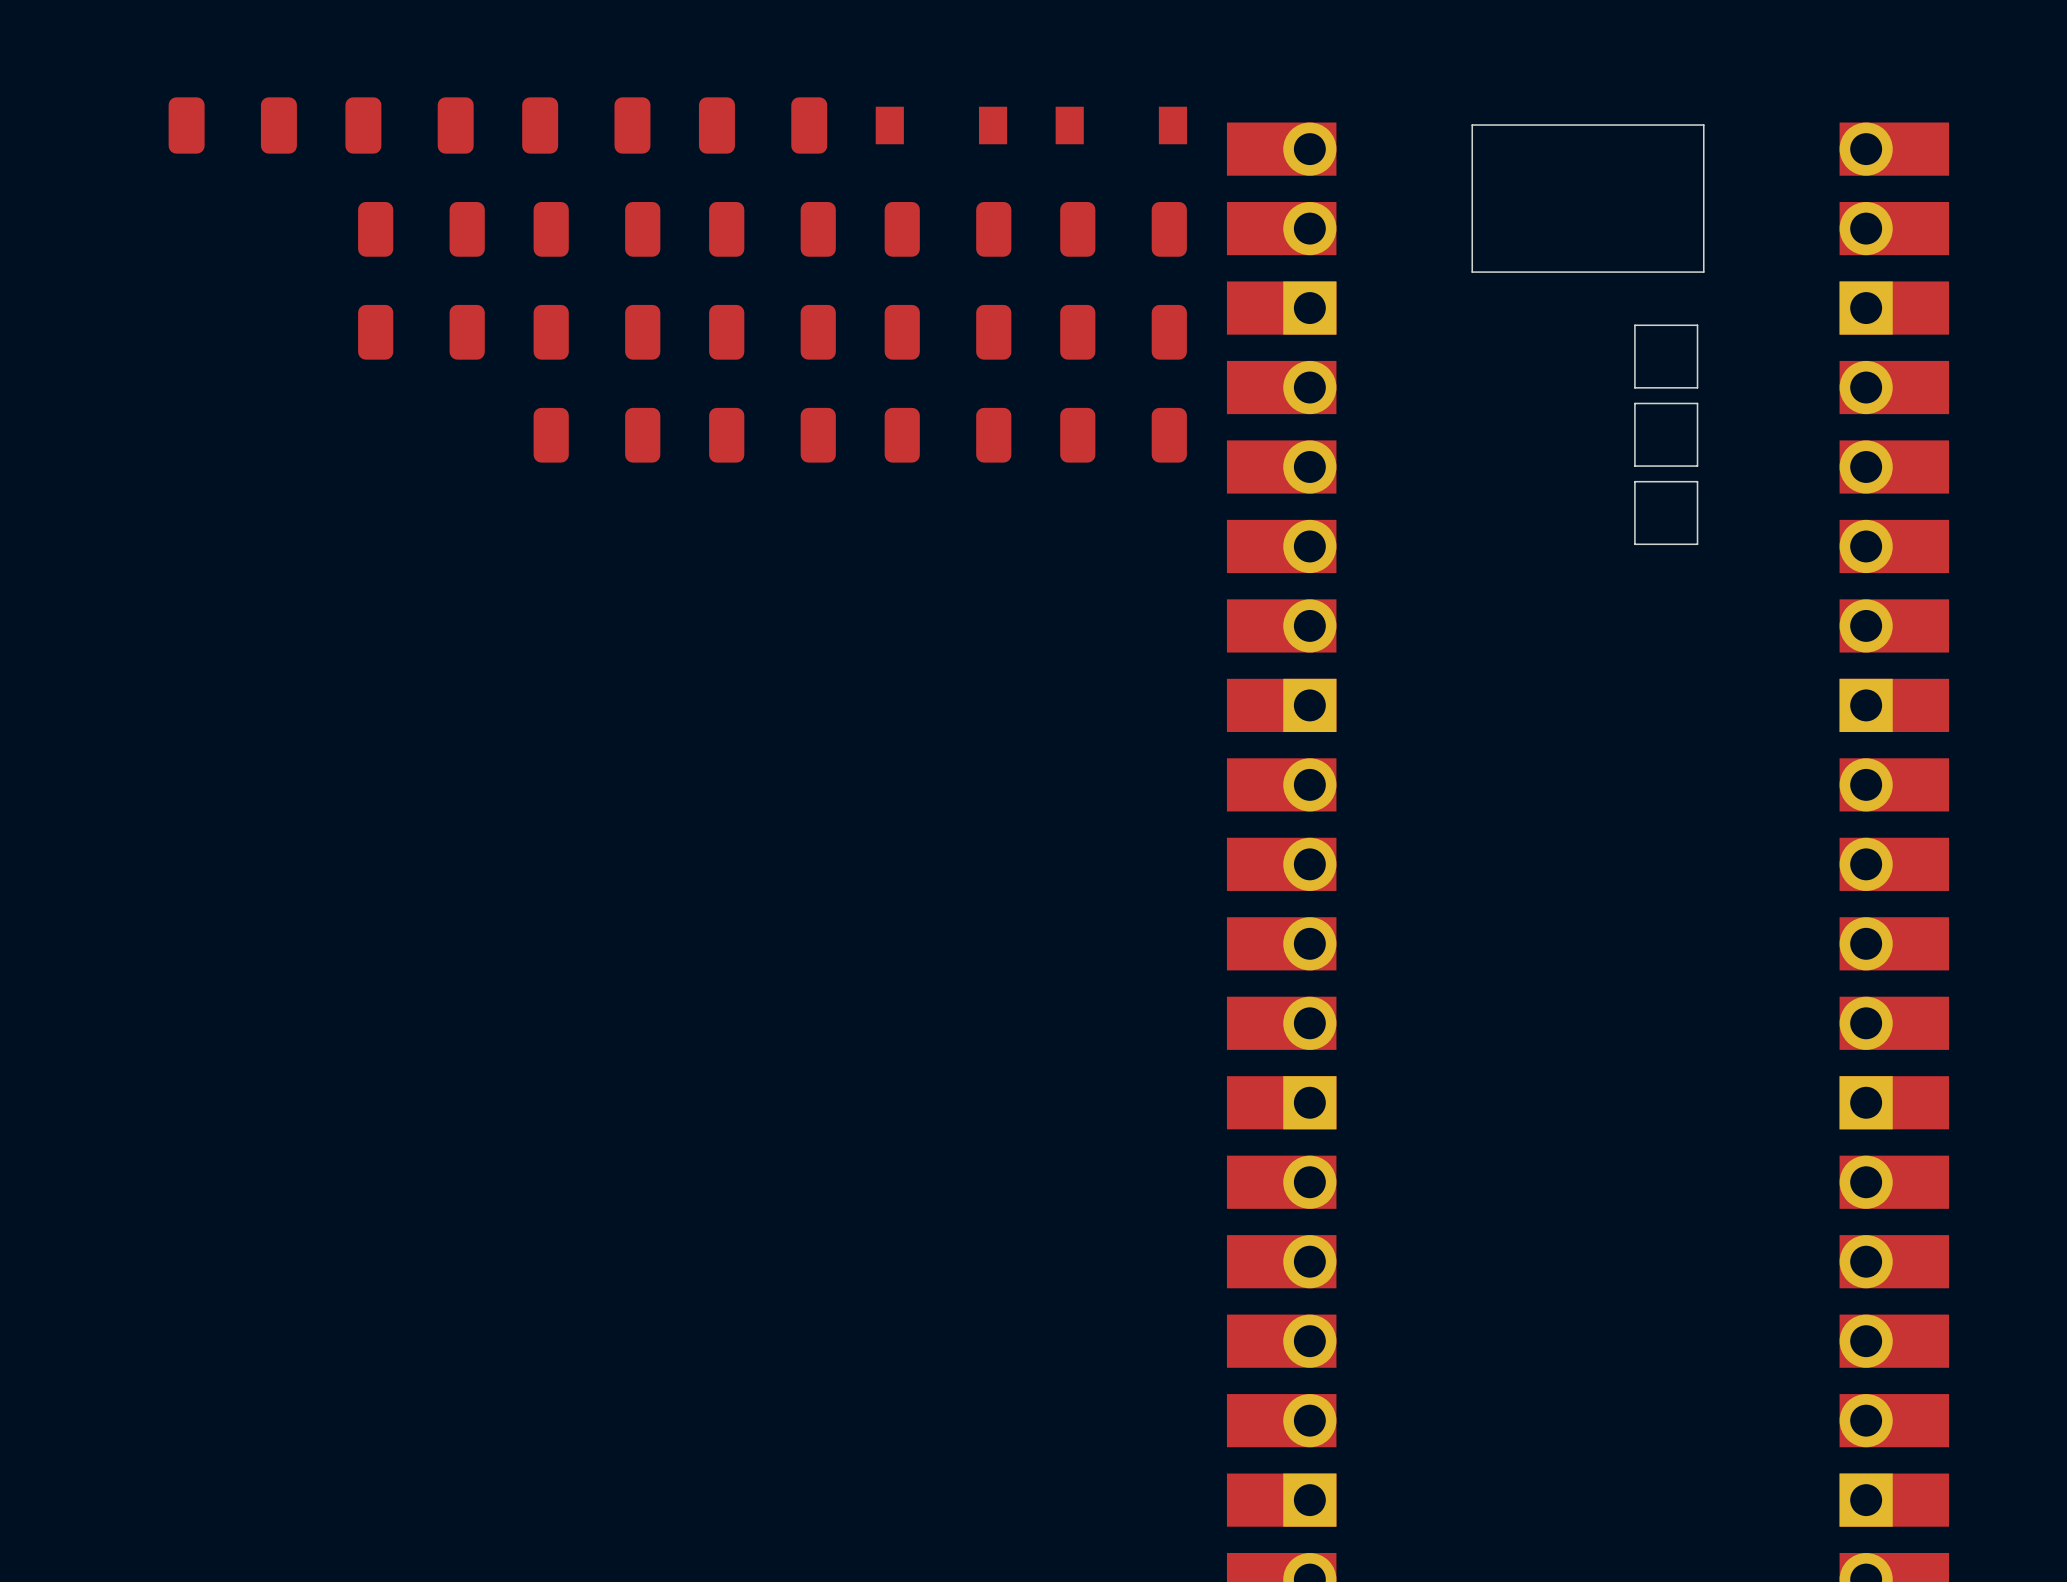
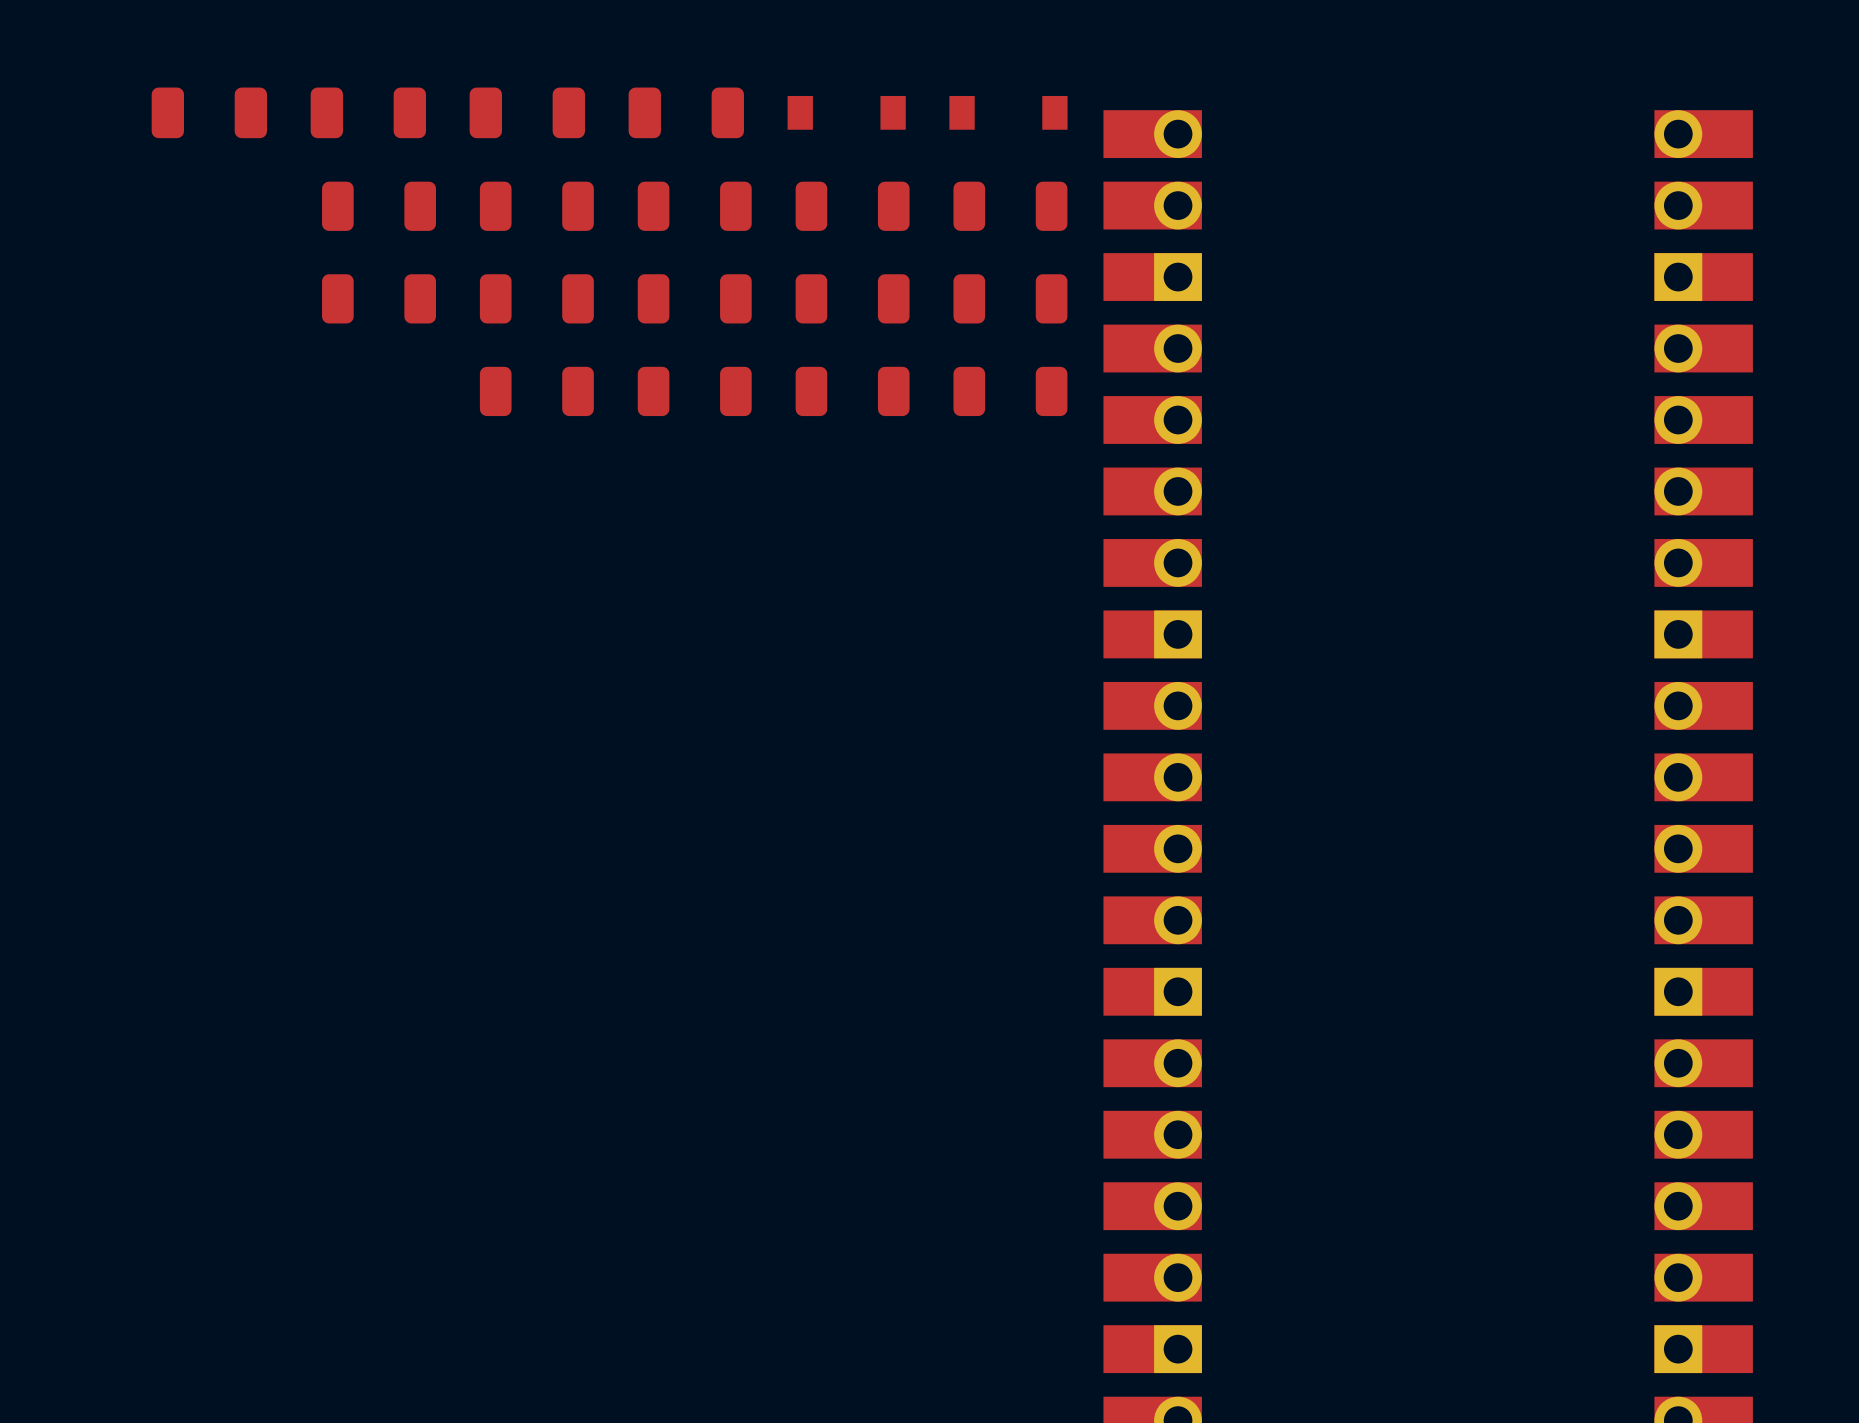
board edge: (1703, 125) (1703, 272) (1472, 272) (1472, 125) (1703, 125) -> none
board edge: (1697, 325) (1697, 387) (1634, 387) (1634, 325) (1697, 325) -> none
board edge: (1697, 403) (1697, 466) (1634, 466) (1634, 403) (1697, 403) -> none
board edge: (1697, 481) (1697, 544) (1634, 544) (1634, 481) (1697, 481) -> none

